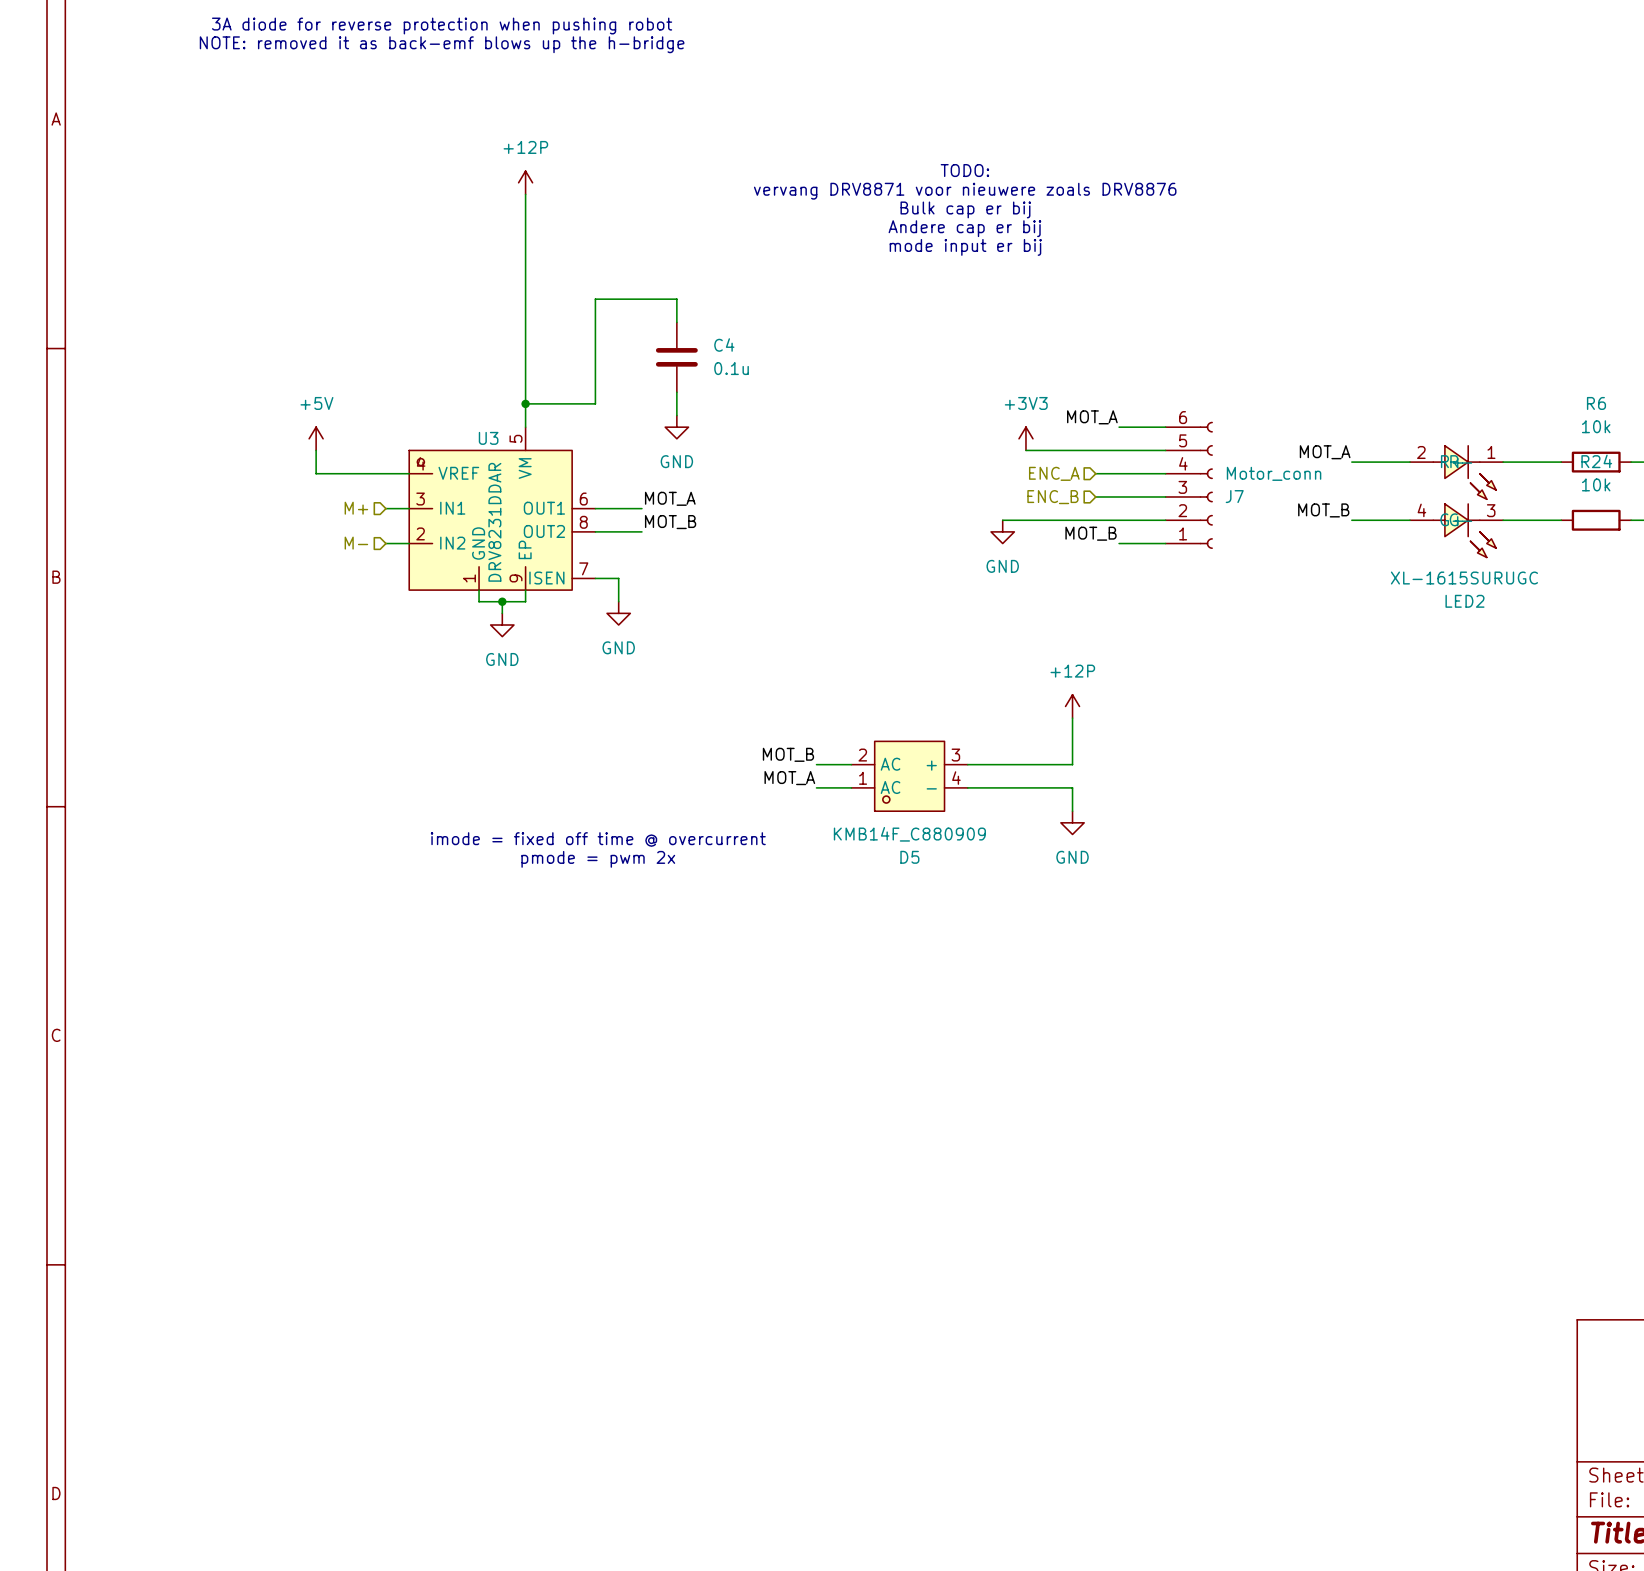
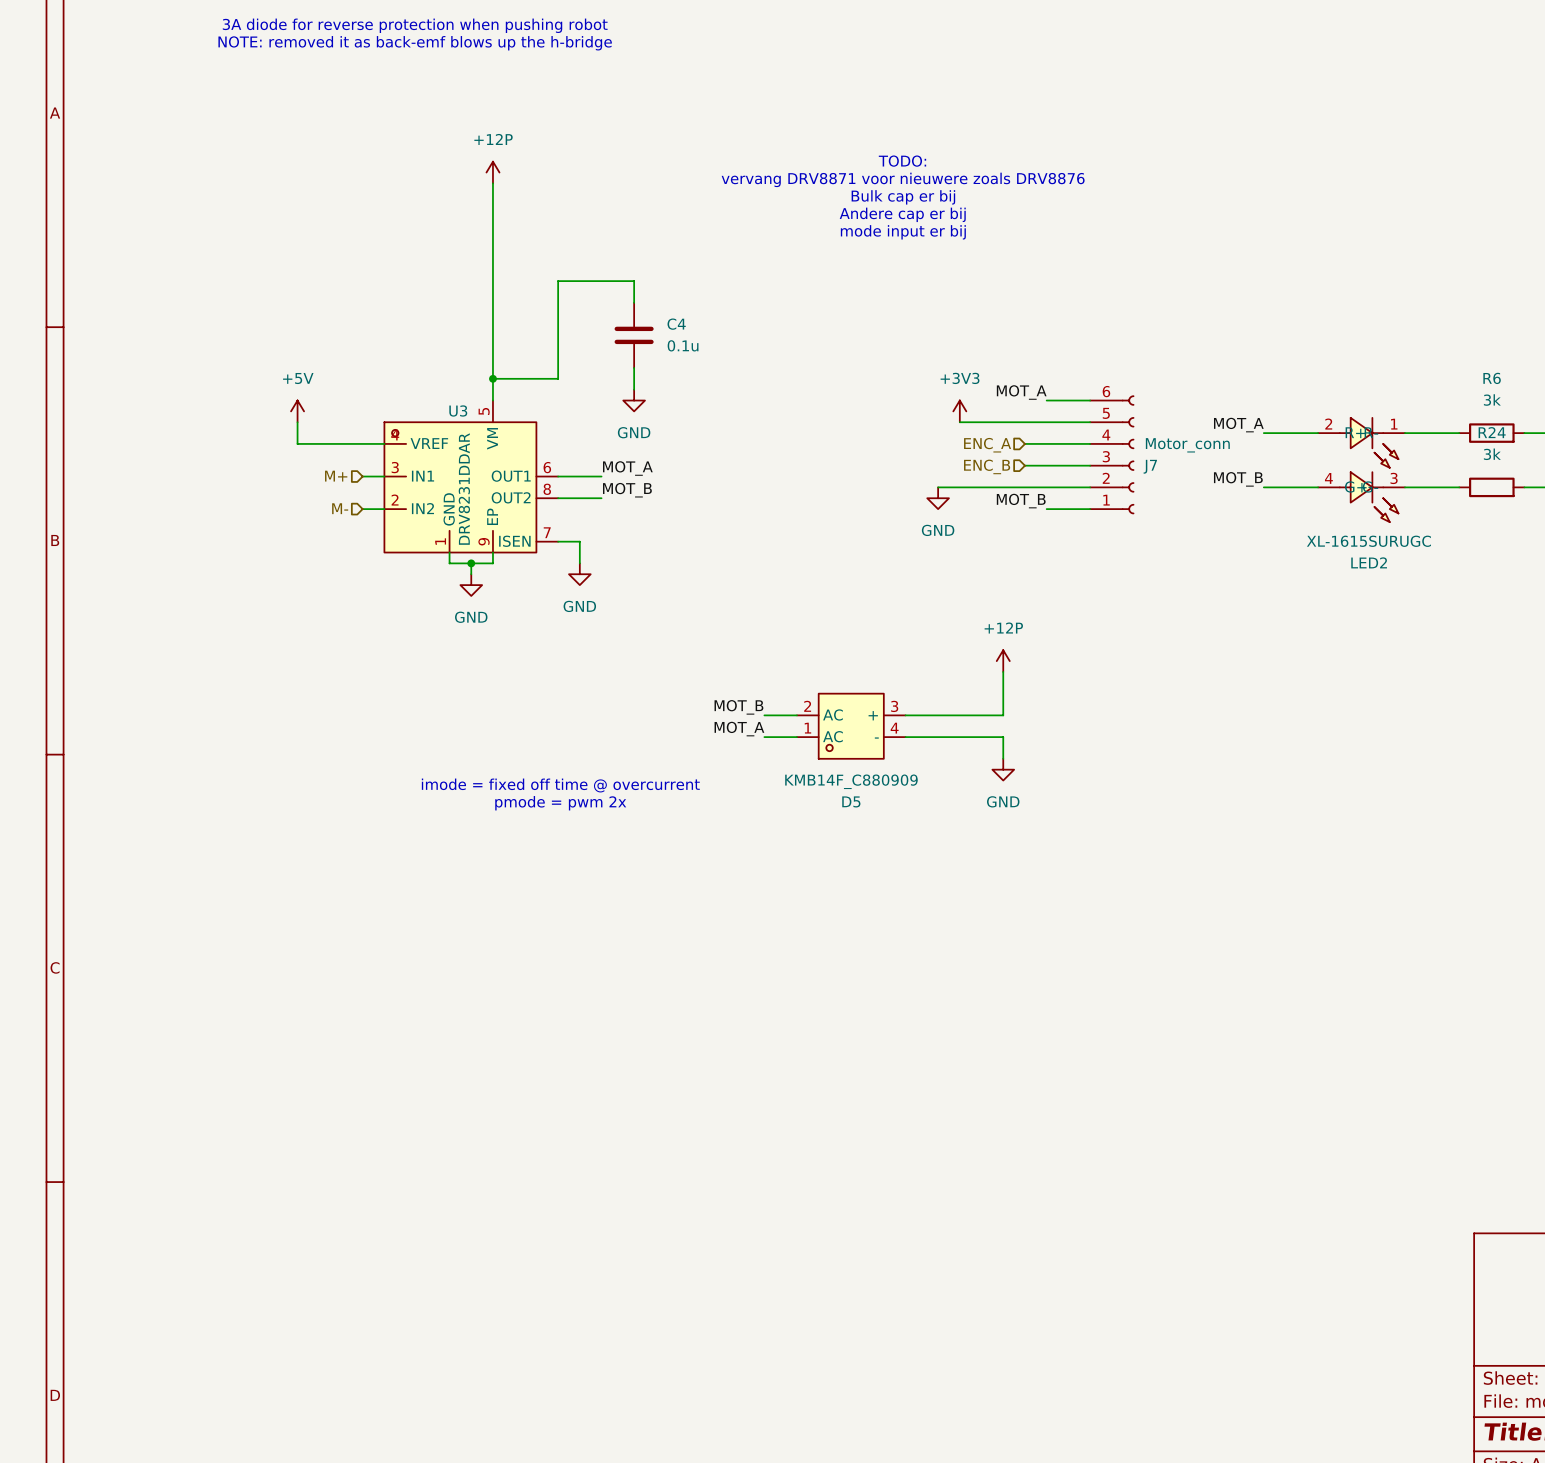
R6 value: 10k (1596, 426) -> 3k (1492, 400)
R24 value: 10k (1596, 484) -> 3k (1492, 454)

